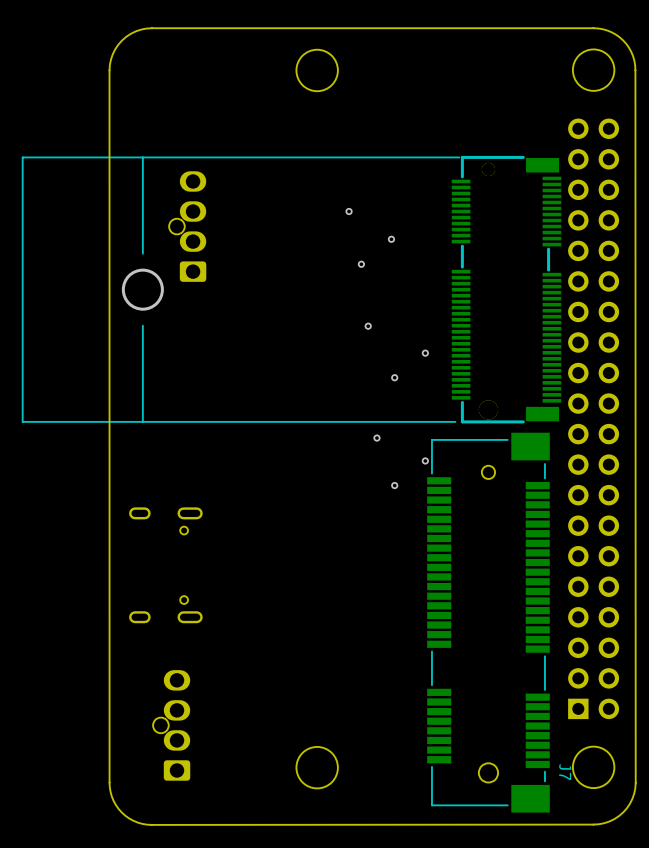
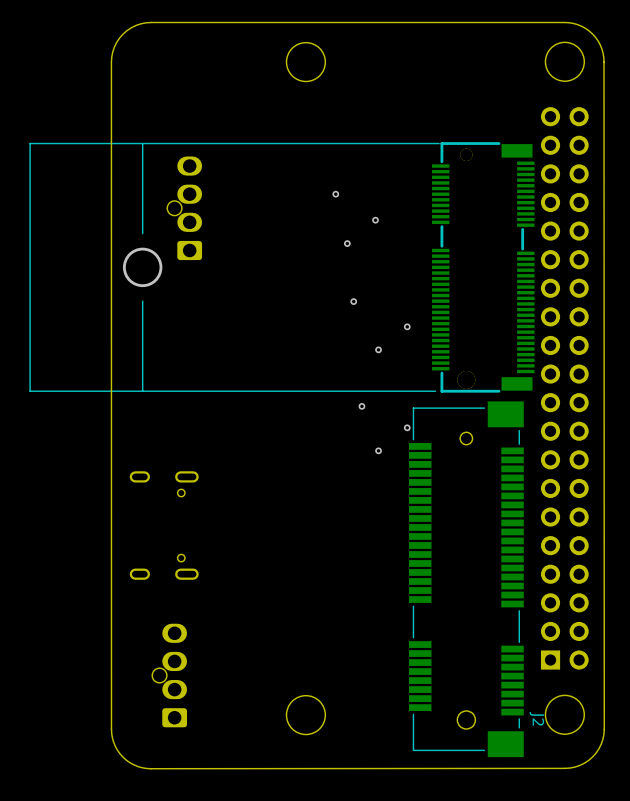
J7 name: J7 (565, 772) -> J2 (536, 718)

